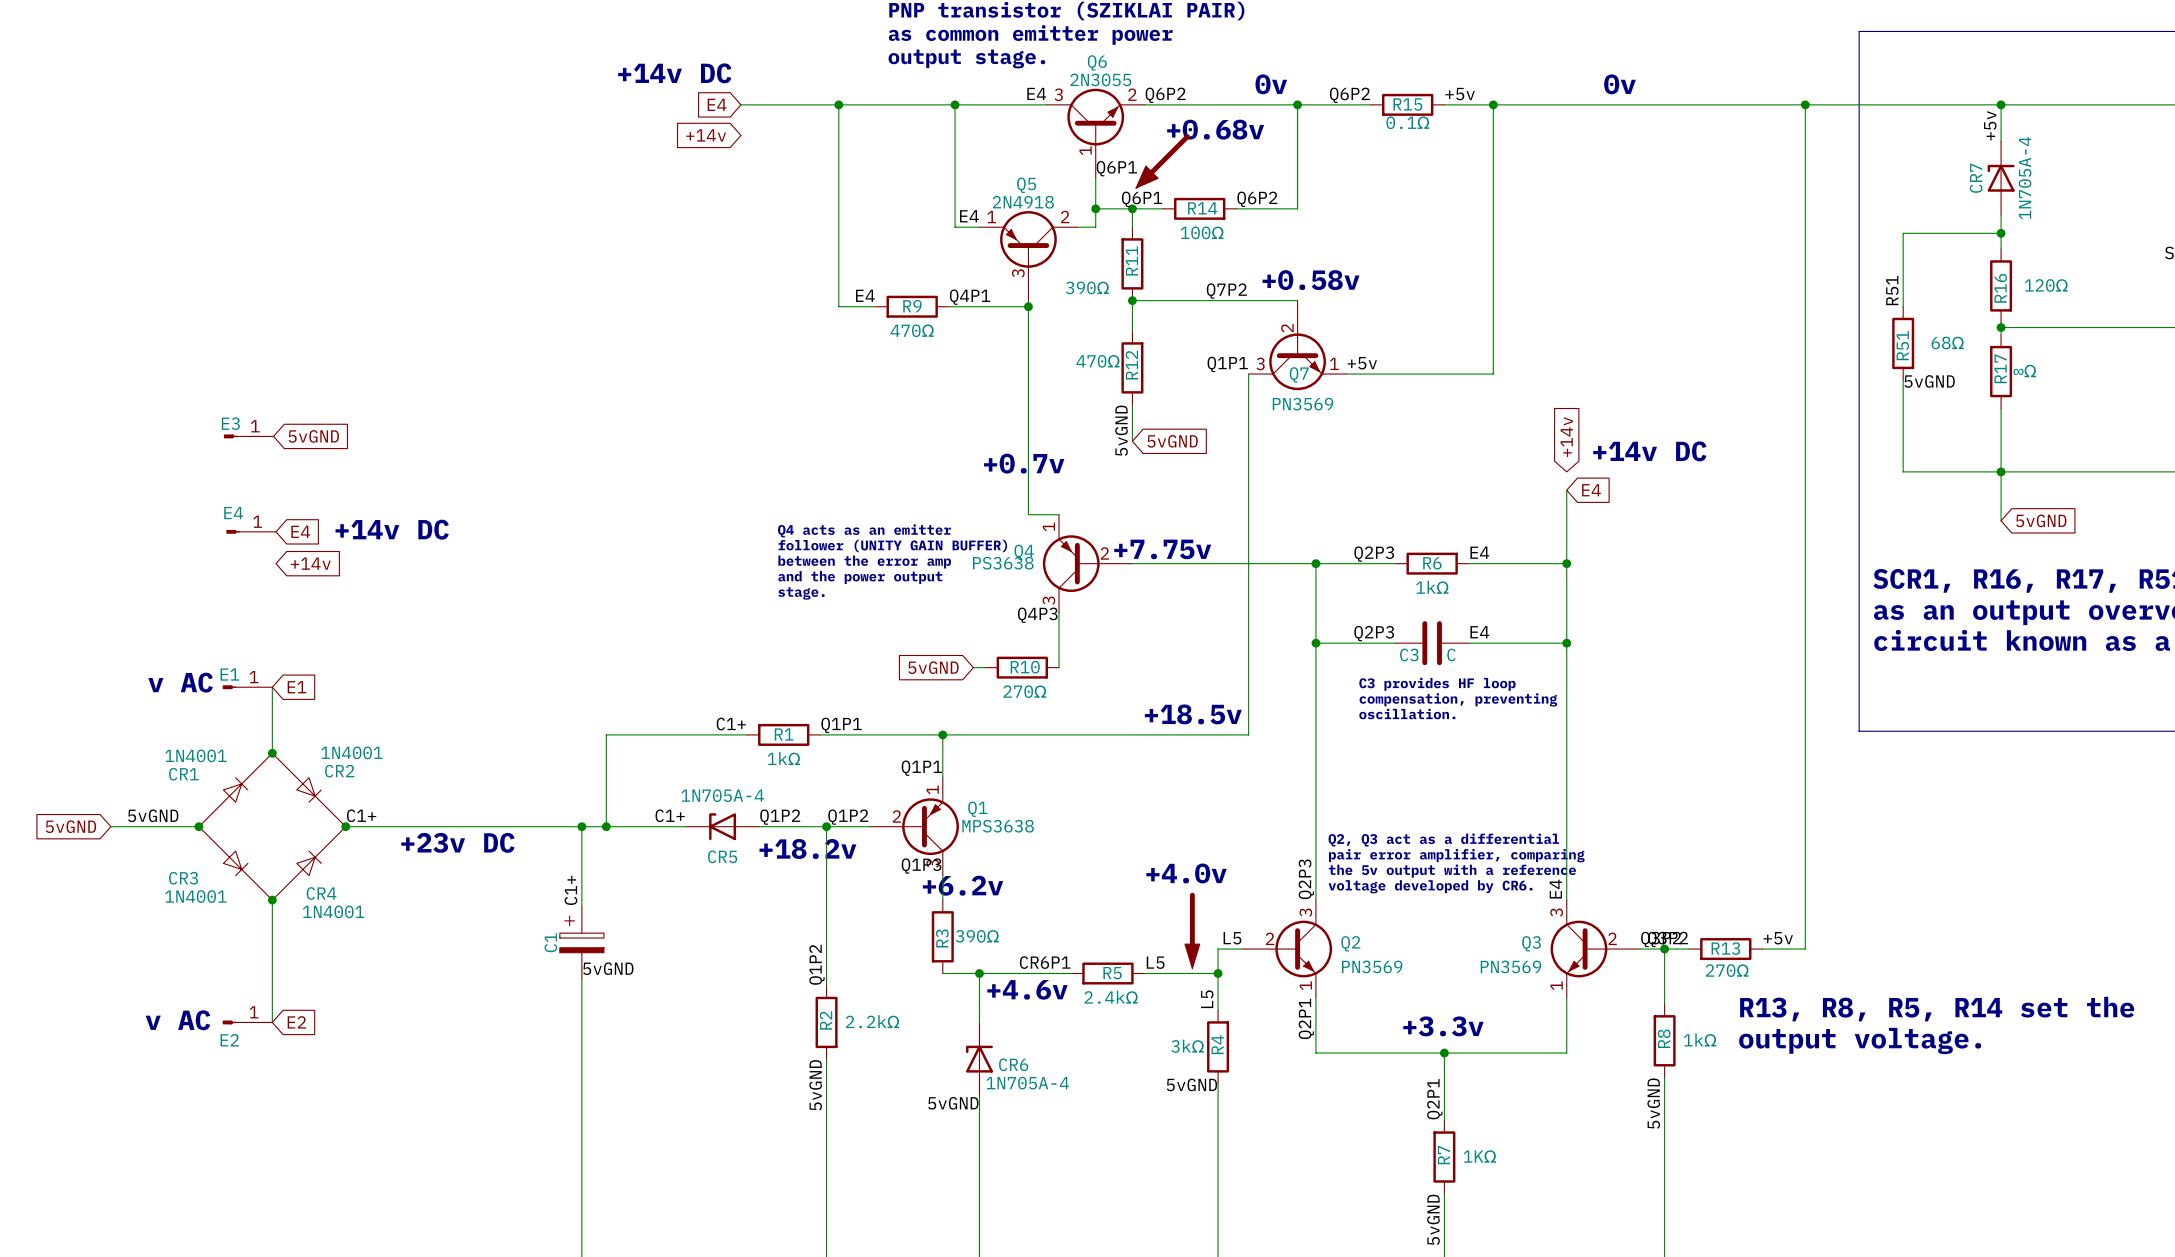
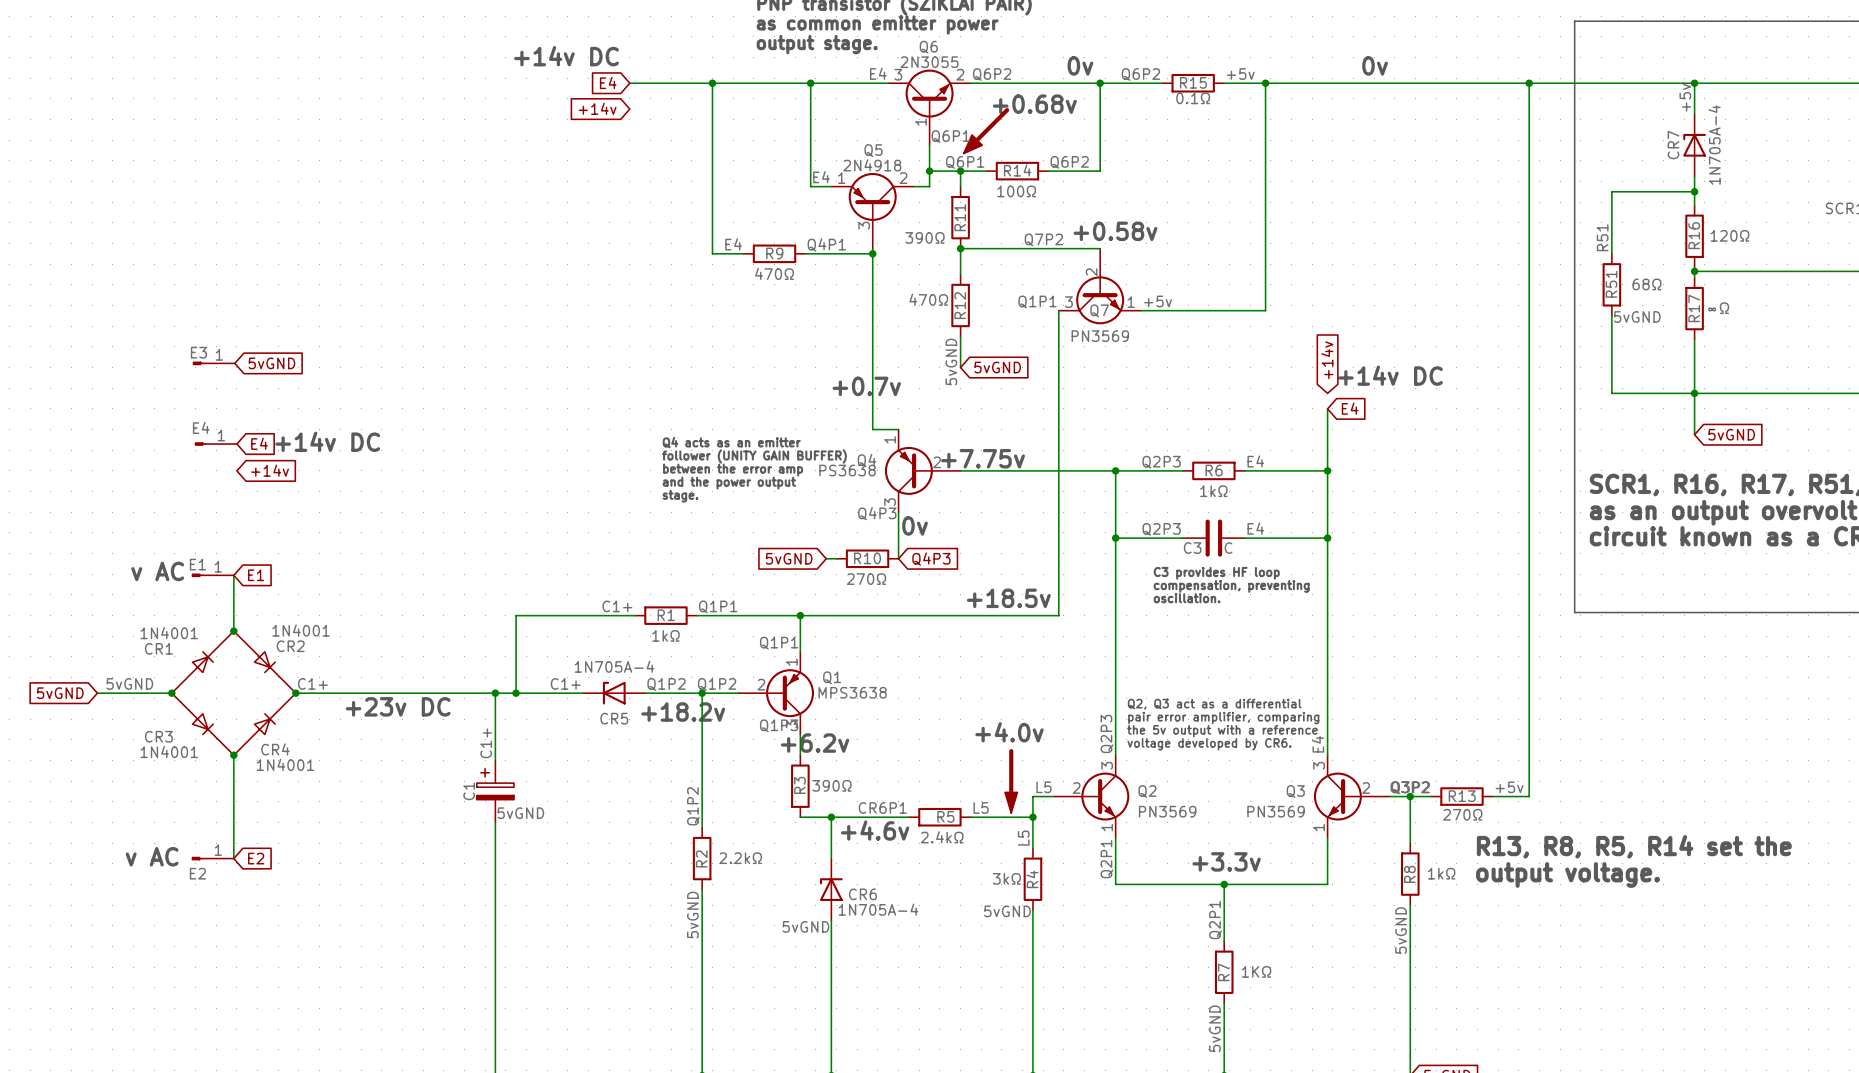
text: none -> 0v (915, 525)
global label: none -> Q4P3 (931, 559)

